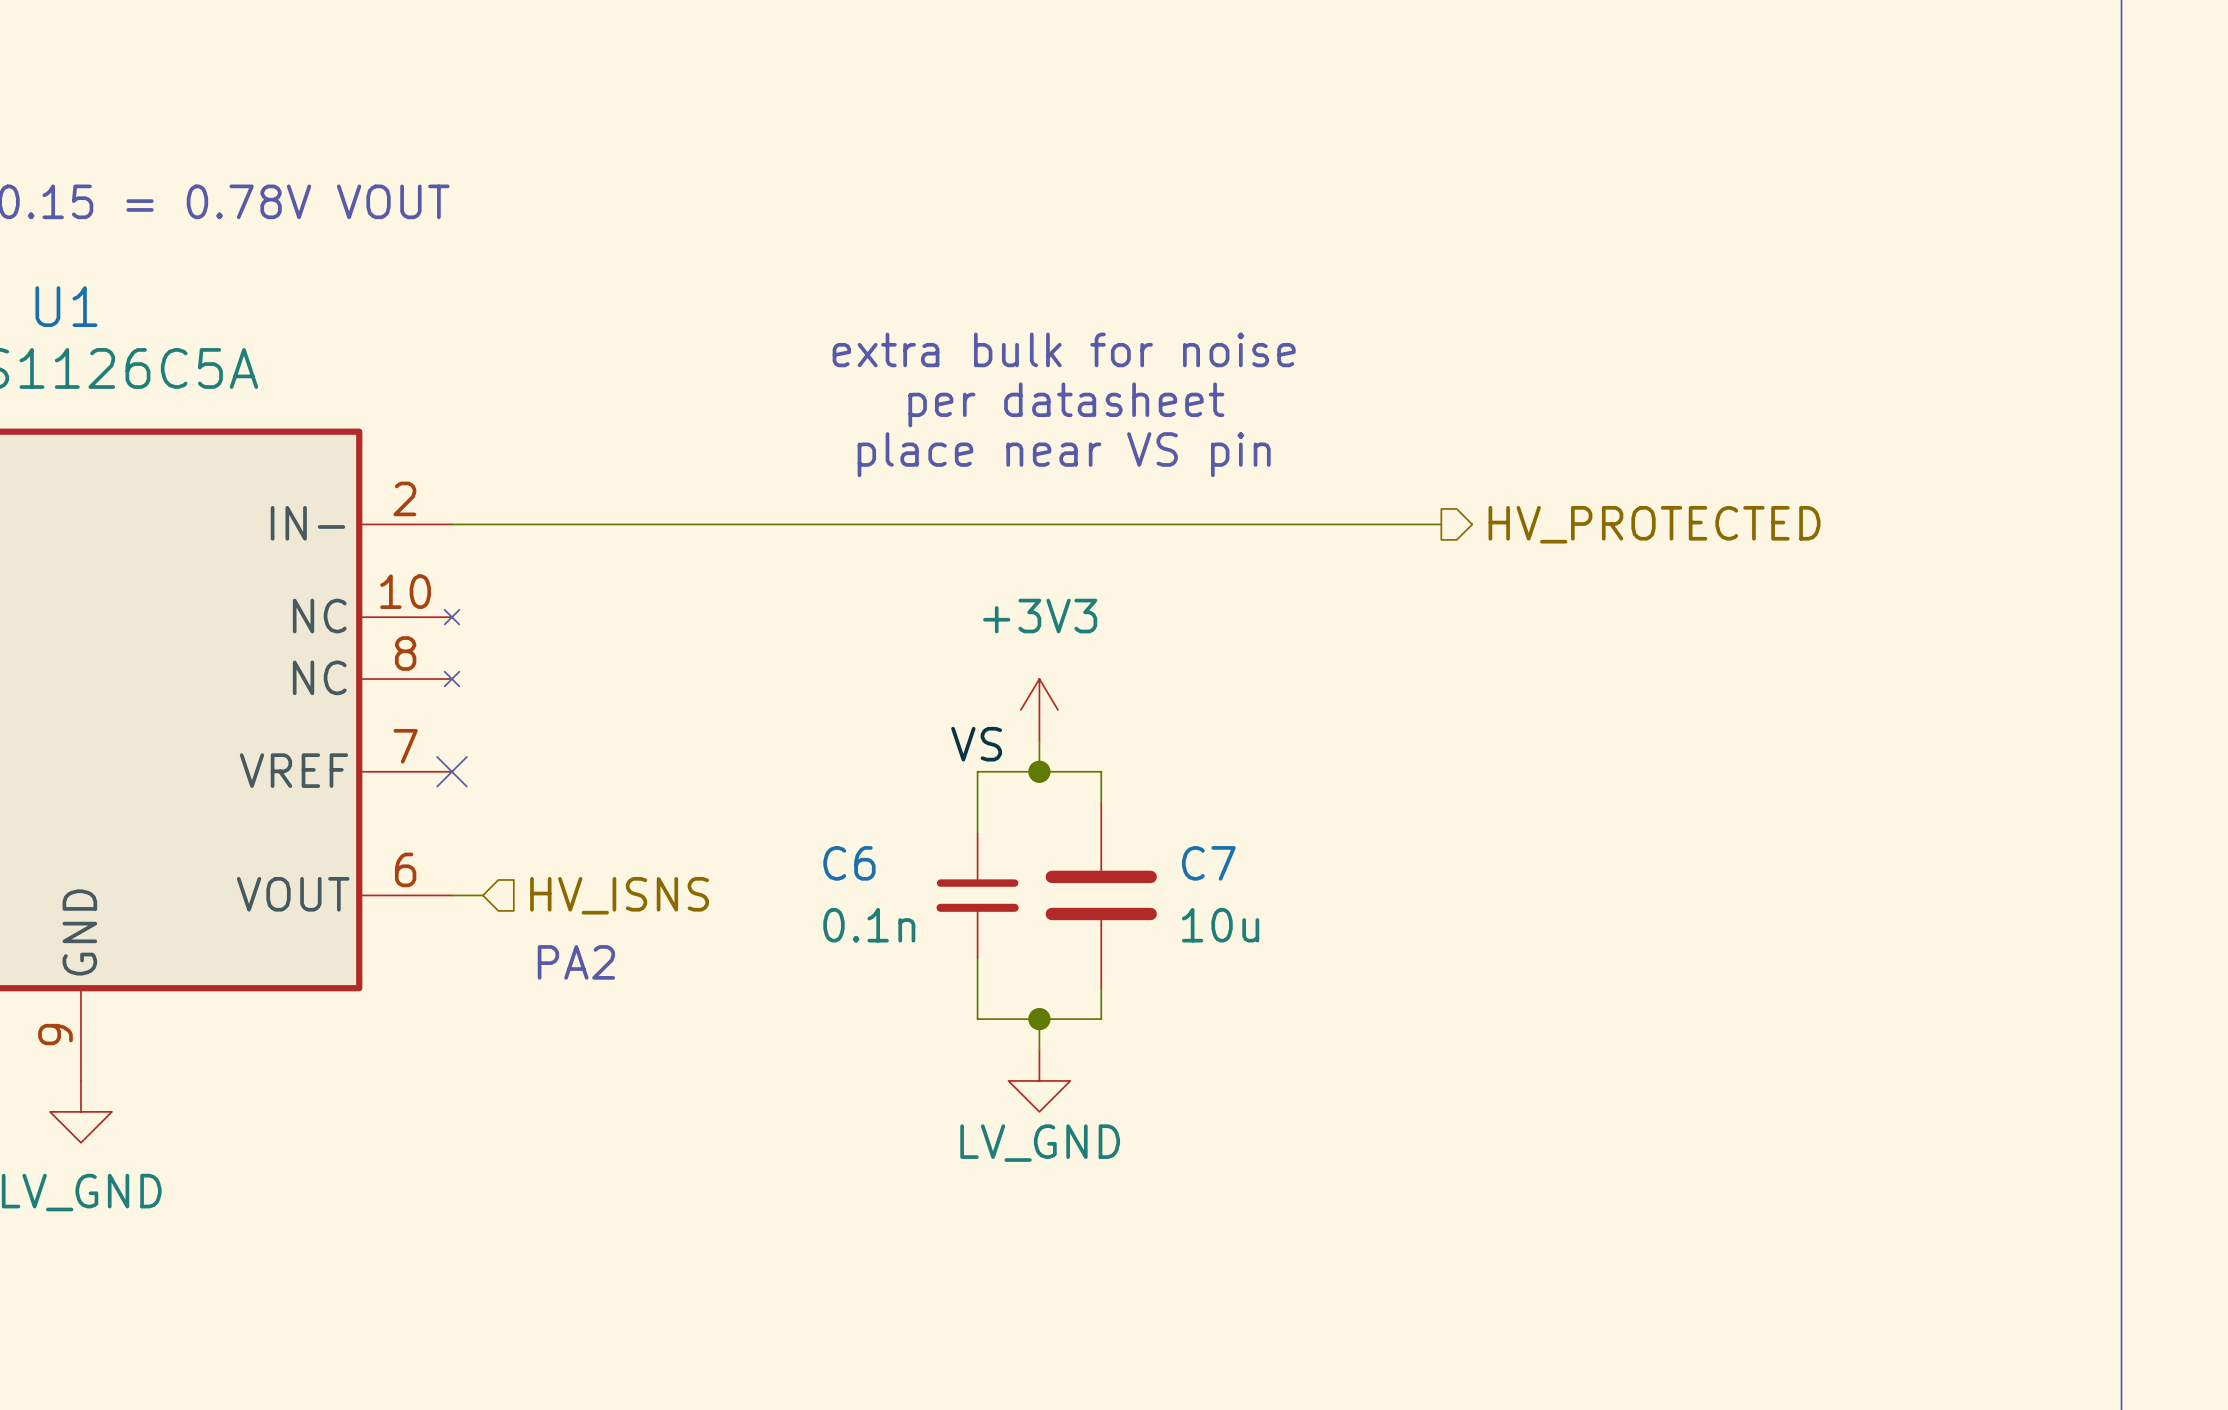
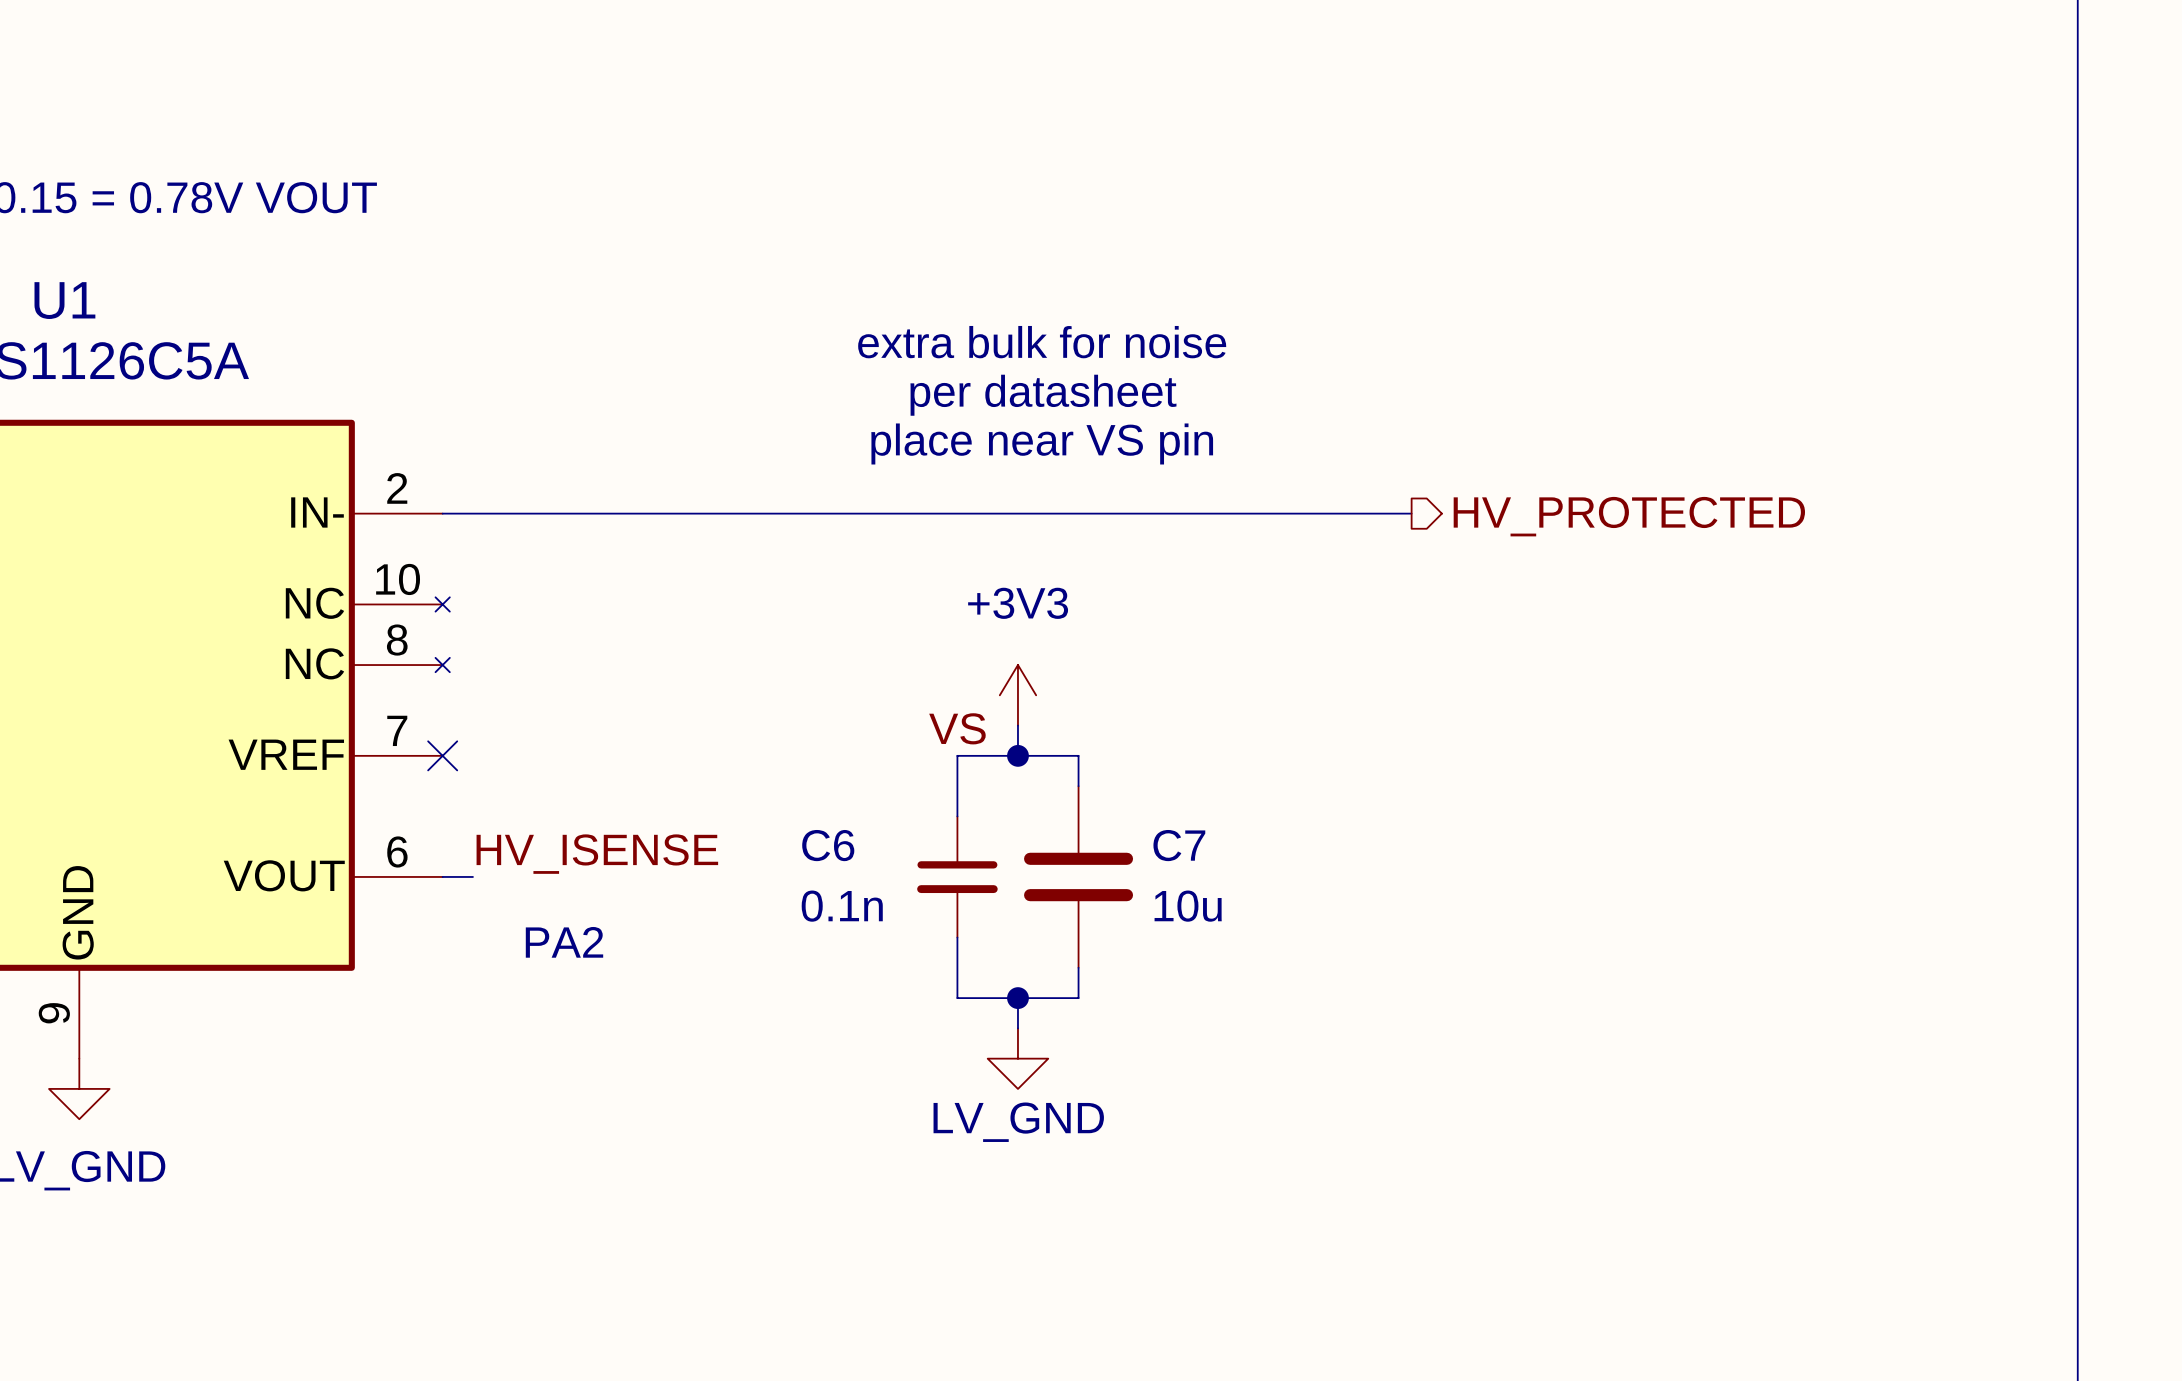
label: none -> HV_ISENSE (597, 854)
hierarchical label: HV_ISNS (619, 895) -> none

